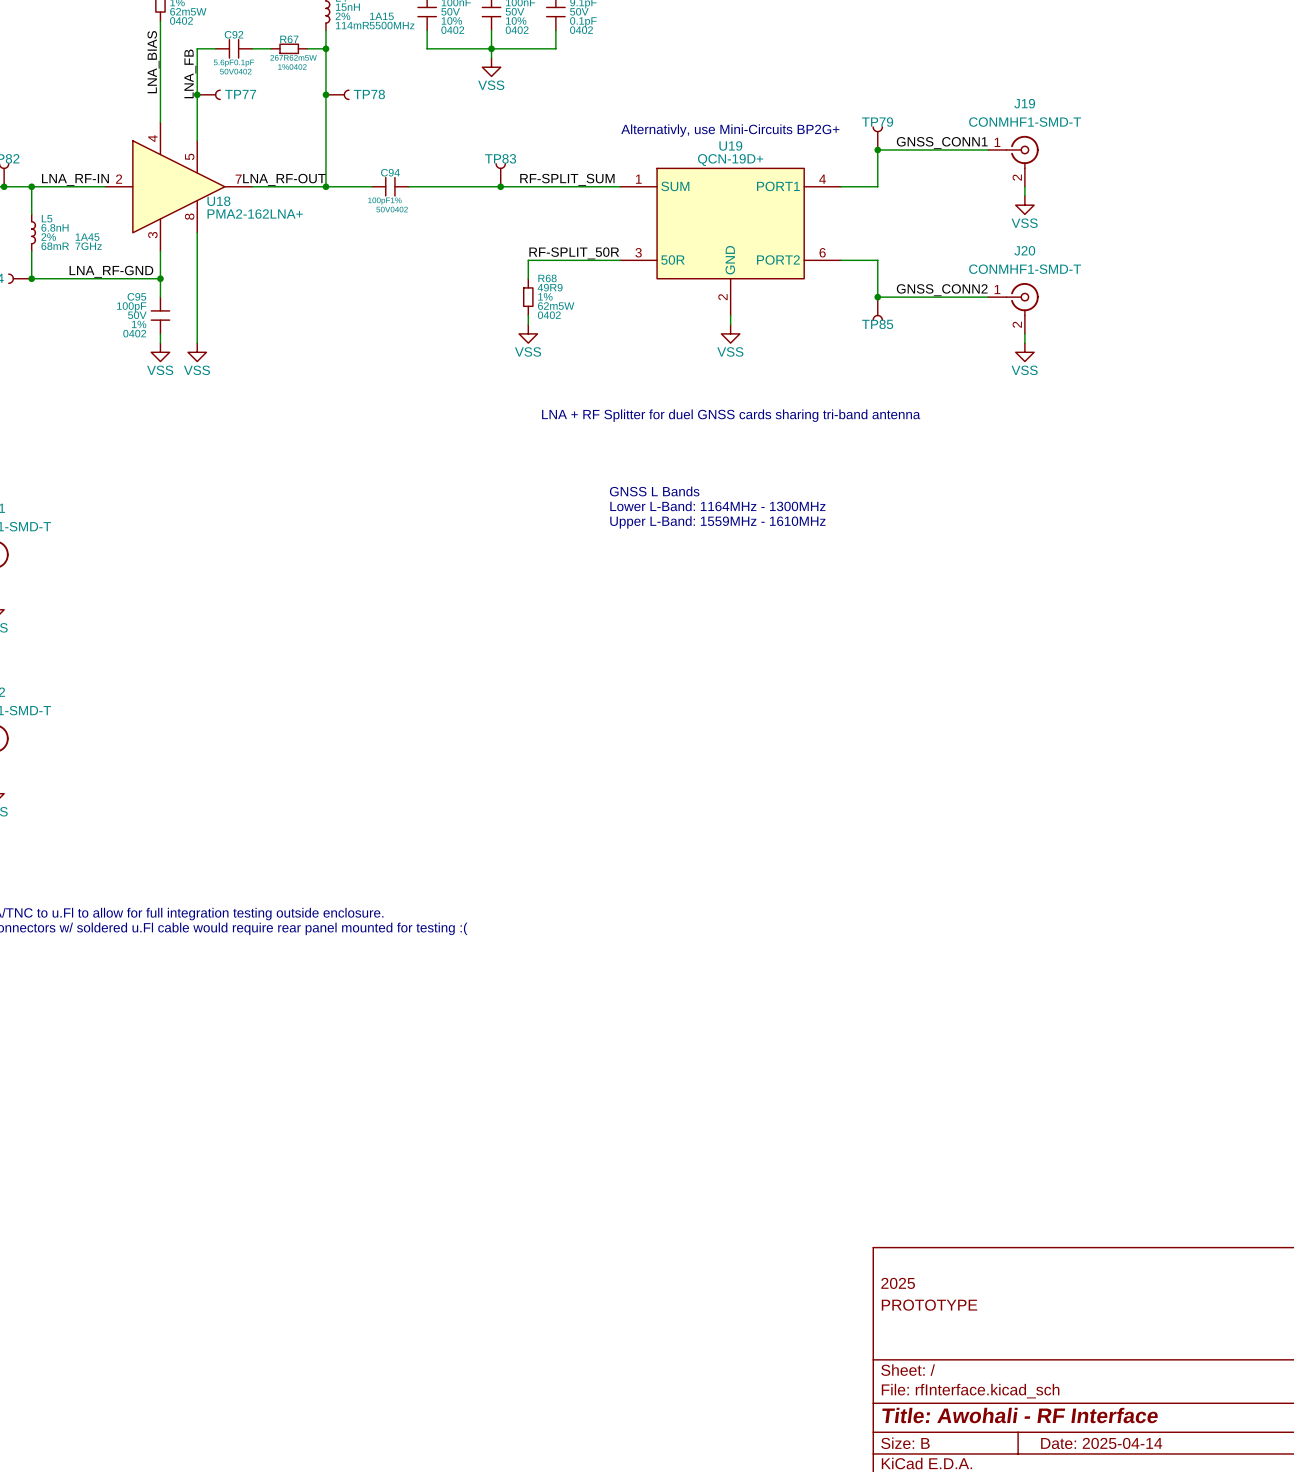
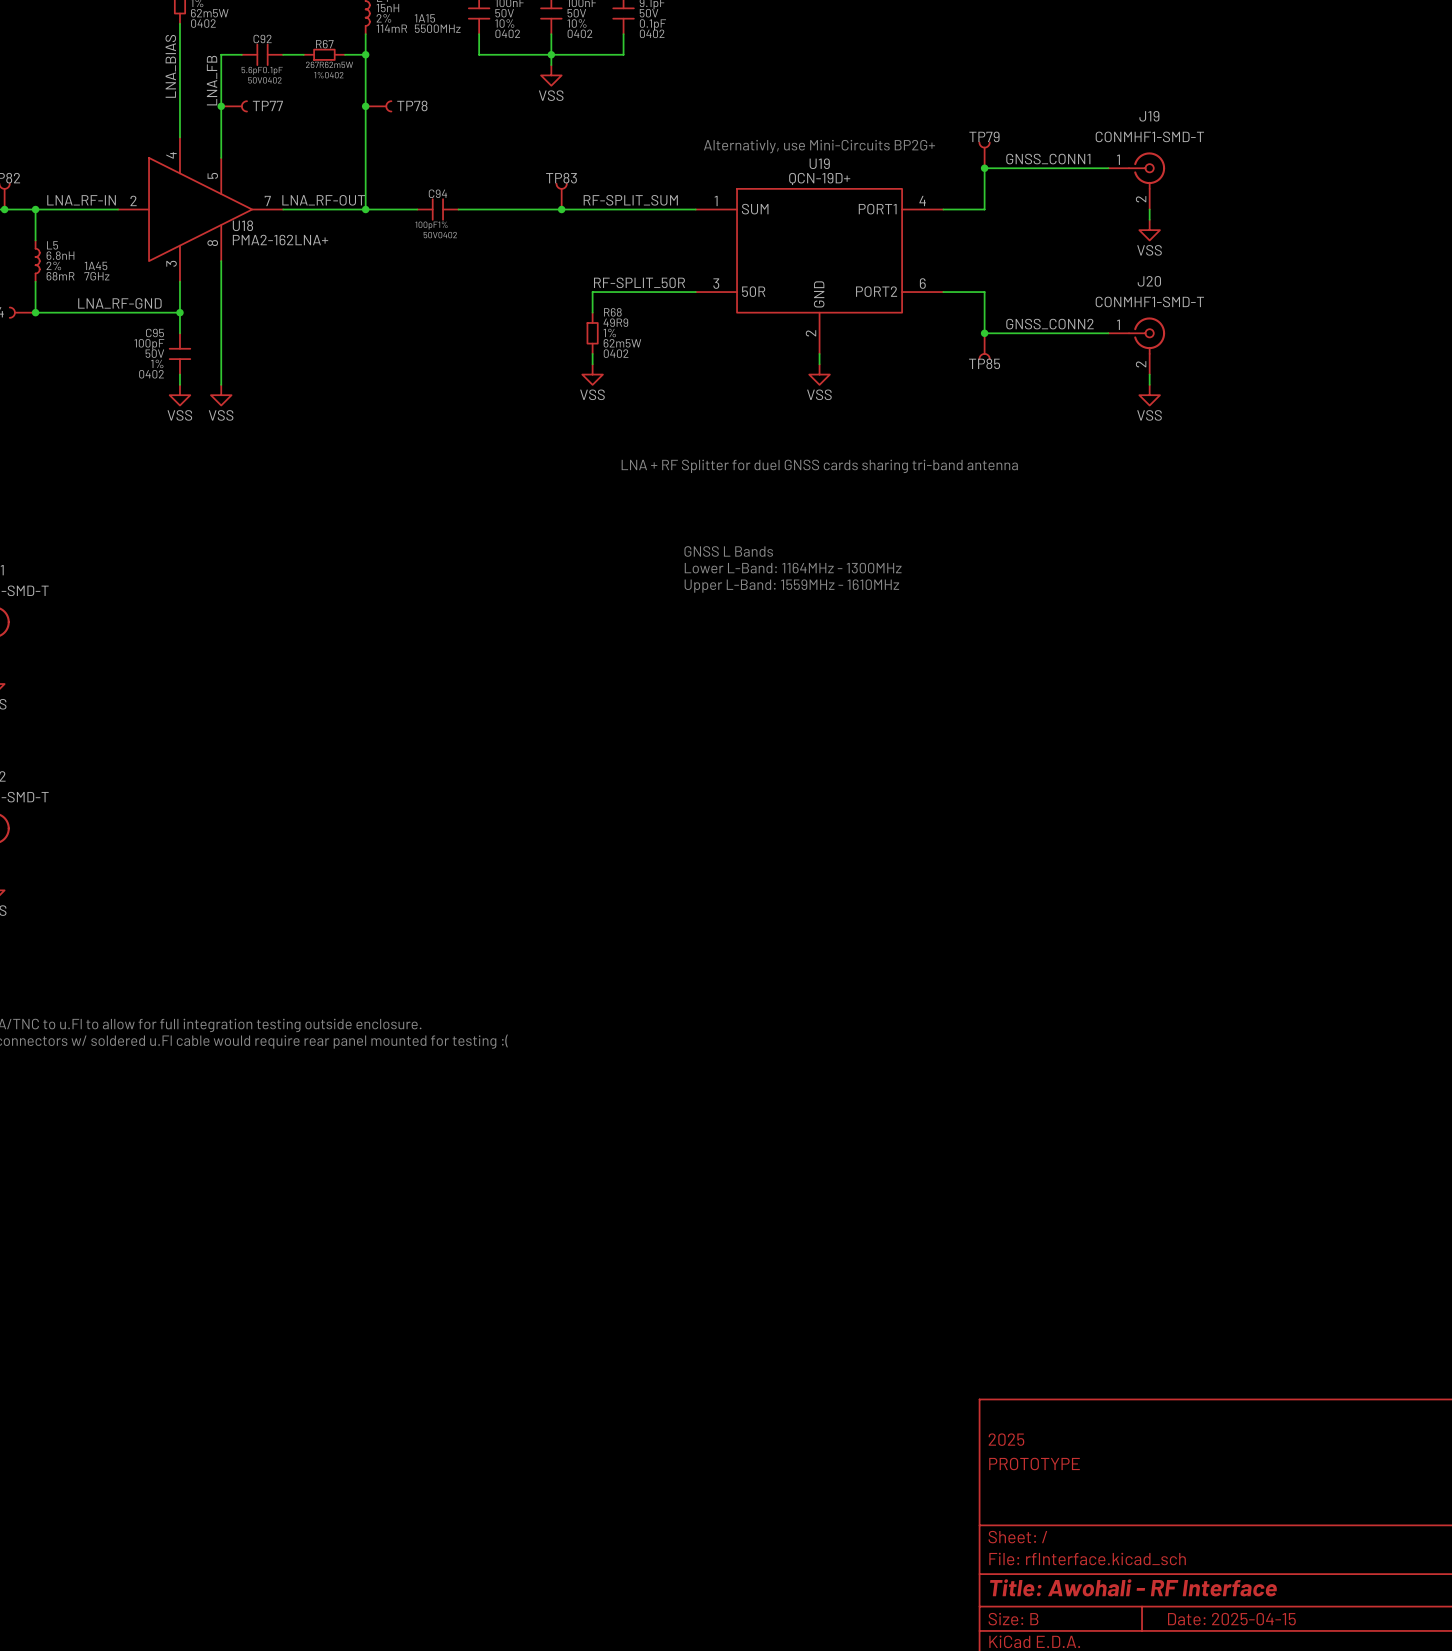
title block: Date: 2025-04-14 (1101, 1443) -> Date: 2025-04-15 (1231, 1619)

